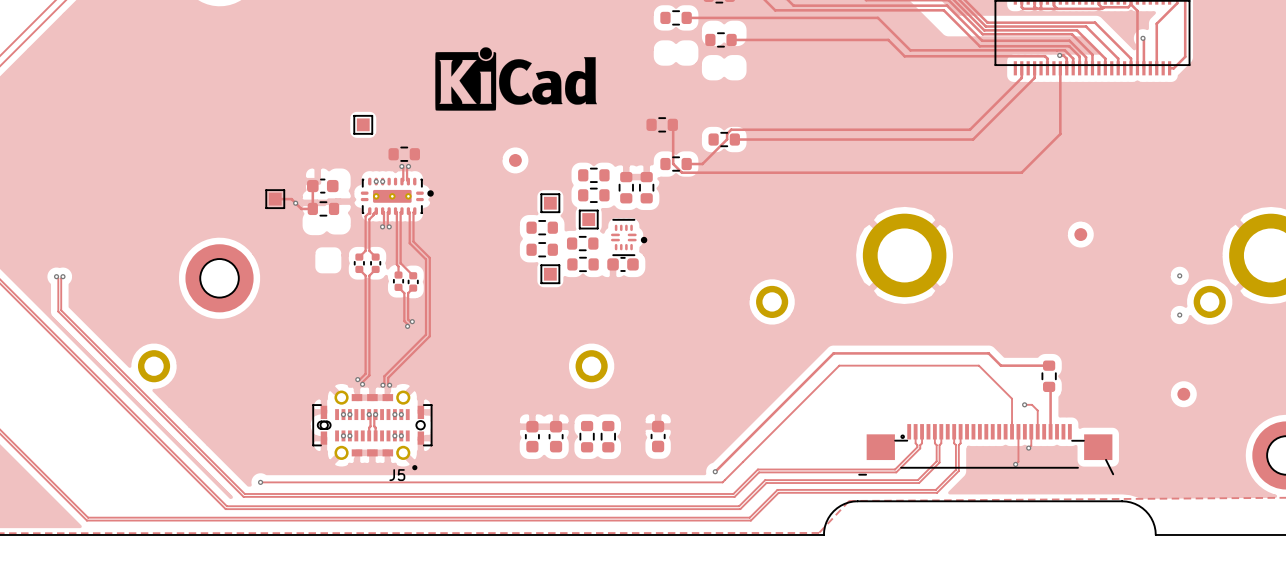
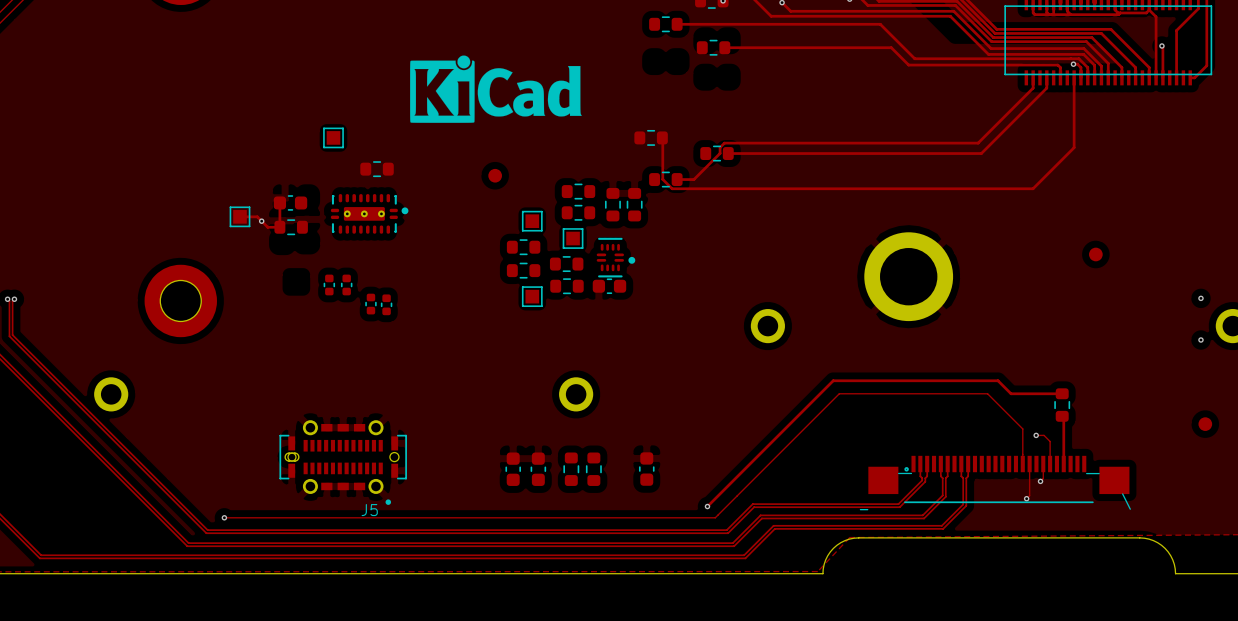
track: (401, 166) (401, 181) -> none
via: (401, 166) -> none
track: (408, 166) (408, 181) -> none
via: (408, 166) -> none
via: (376, 181) -> none
via: (382, 181) -> none
track: (369, 211) (365, 216) (365, 250) (359, 257) -> none
track: (376, 211) (369, 219) (369, 250) (375, 257) -> none
track: (382, 211) (382, 226) -> none
track: (389, 211) (389, 226) -> none
track: (395, 211) (398, 275) -> none
track: (401, 211) (400, 263) (413, 275) -> none
track: (408, 211) (409, 243) (426, 259) (426, 334) (384, 376) (382, 385) -> none
track: (414, 211) (413, 241) (429, 257) (429, 336) (388, 377) (389, 385) -> none
via: (382, 226) -> none
via: (389, 226) -> none
track: (359, 269) (365, 275) (365, 373) (357, 379) -> none
track: (375, 269) (369, 275) (369, 375) (362, 384) -> none
track: (398, 287) (404, 293) (404, 321) (407, 326) -> none
track: (413, 288) (408, 293) (408, 319) (412, 321) -> none
via: (412, 321) -> none
via: (407, 326) -> none
via: (357, 379) -> none
via: (362, 384) -> none
via: (382, 385) -> none
via: (389, 385) -> none
via: (343, 414) -> none
via: (349, 414) -> none
track: (369, 414) (369, 435) -> none
via: (369, 414) -> none
track: (375, 414) (375, 435) -> none
via: (375, 414) -> none
via: (394, 414) -> none
via: (401, 414) -> none
via: (343, 435) -> none
via: (349, 435) -> none
via: (394, 435) -> none
via: (401, 435) -> none

